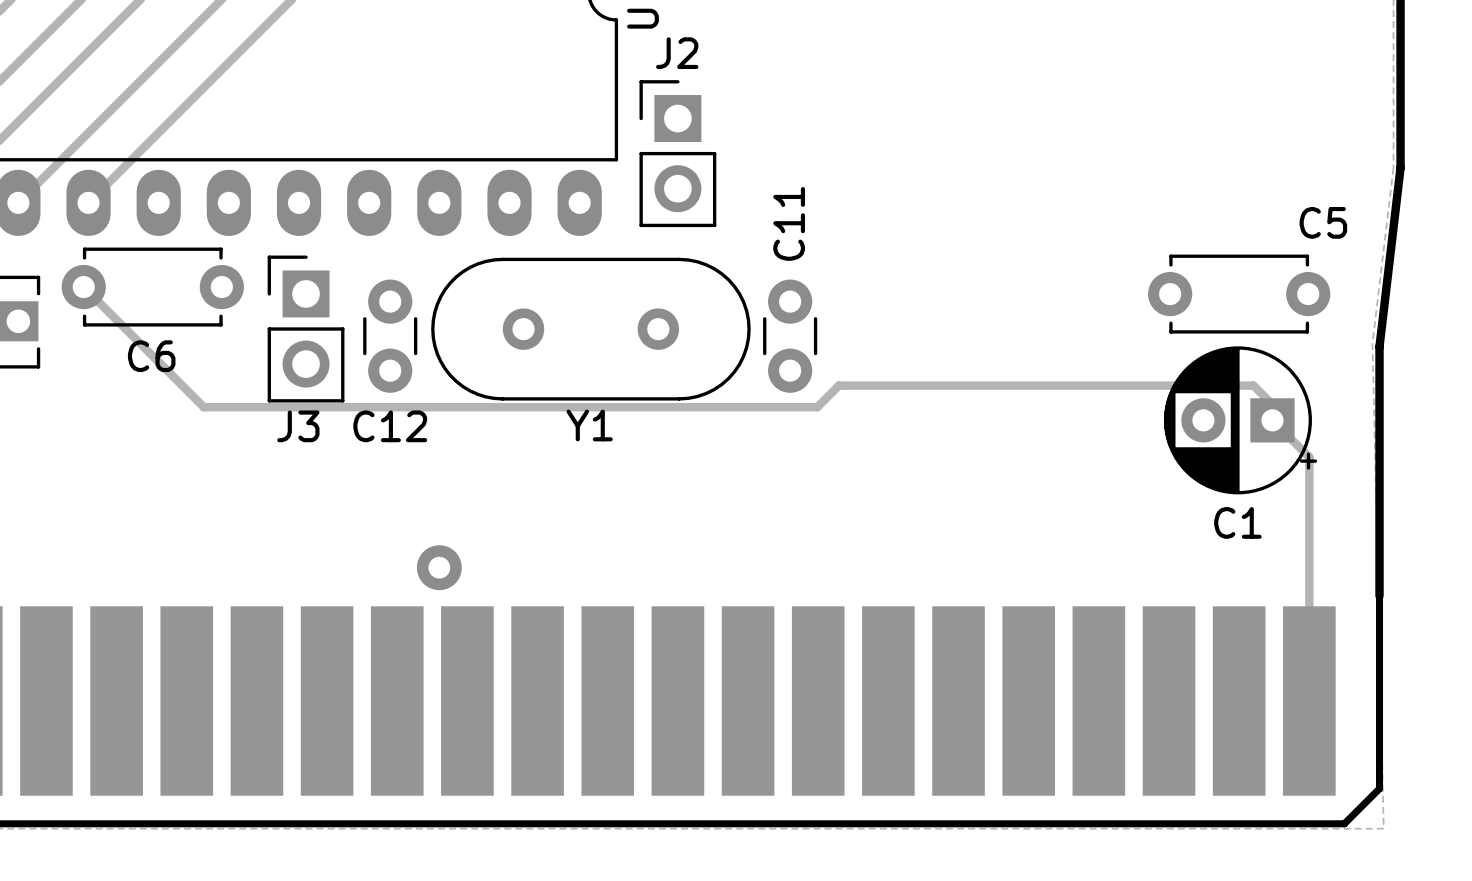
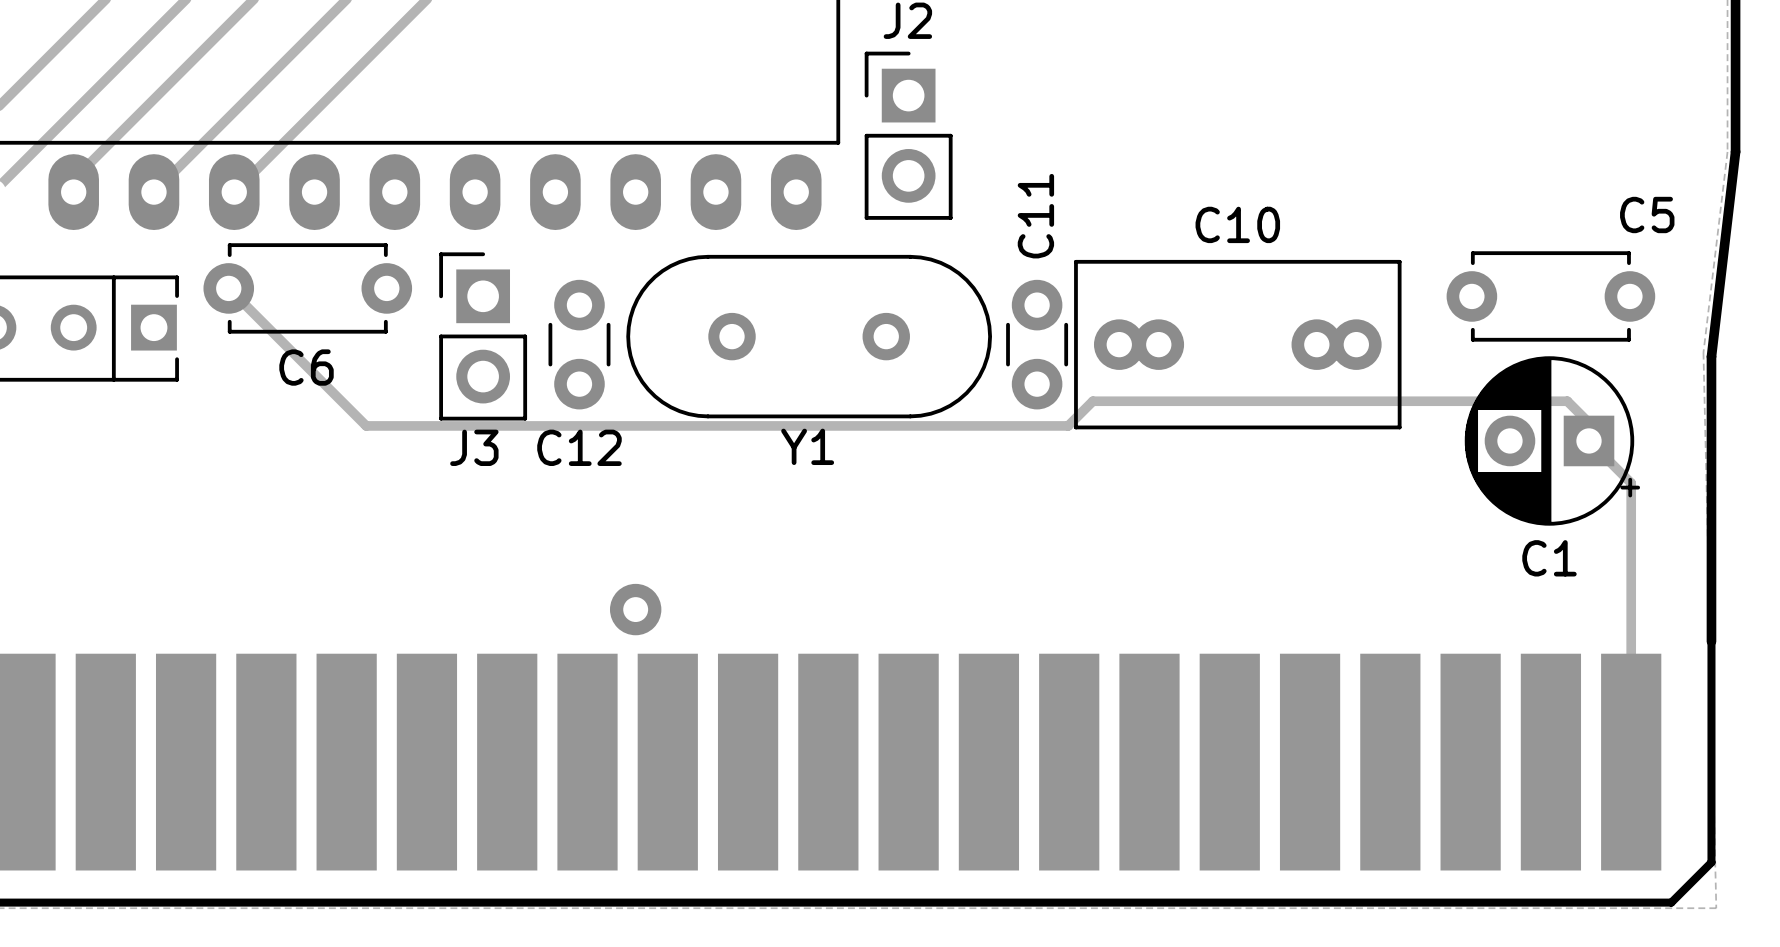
C10: none -> (1237, 344)

